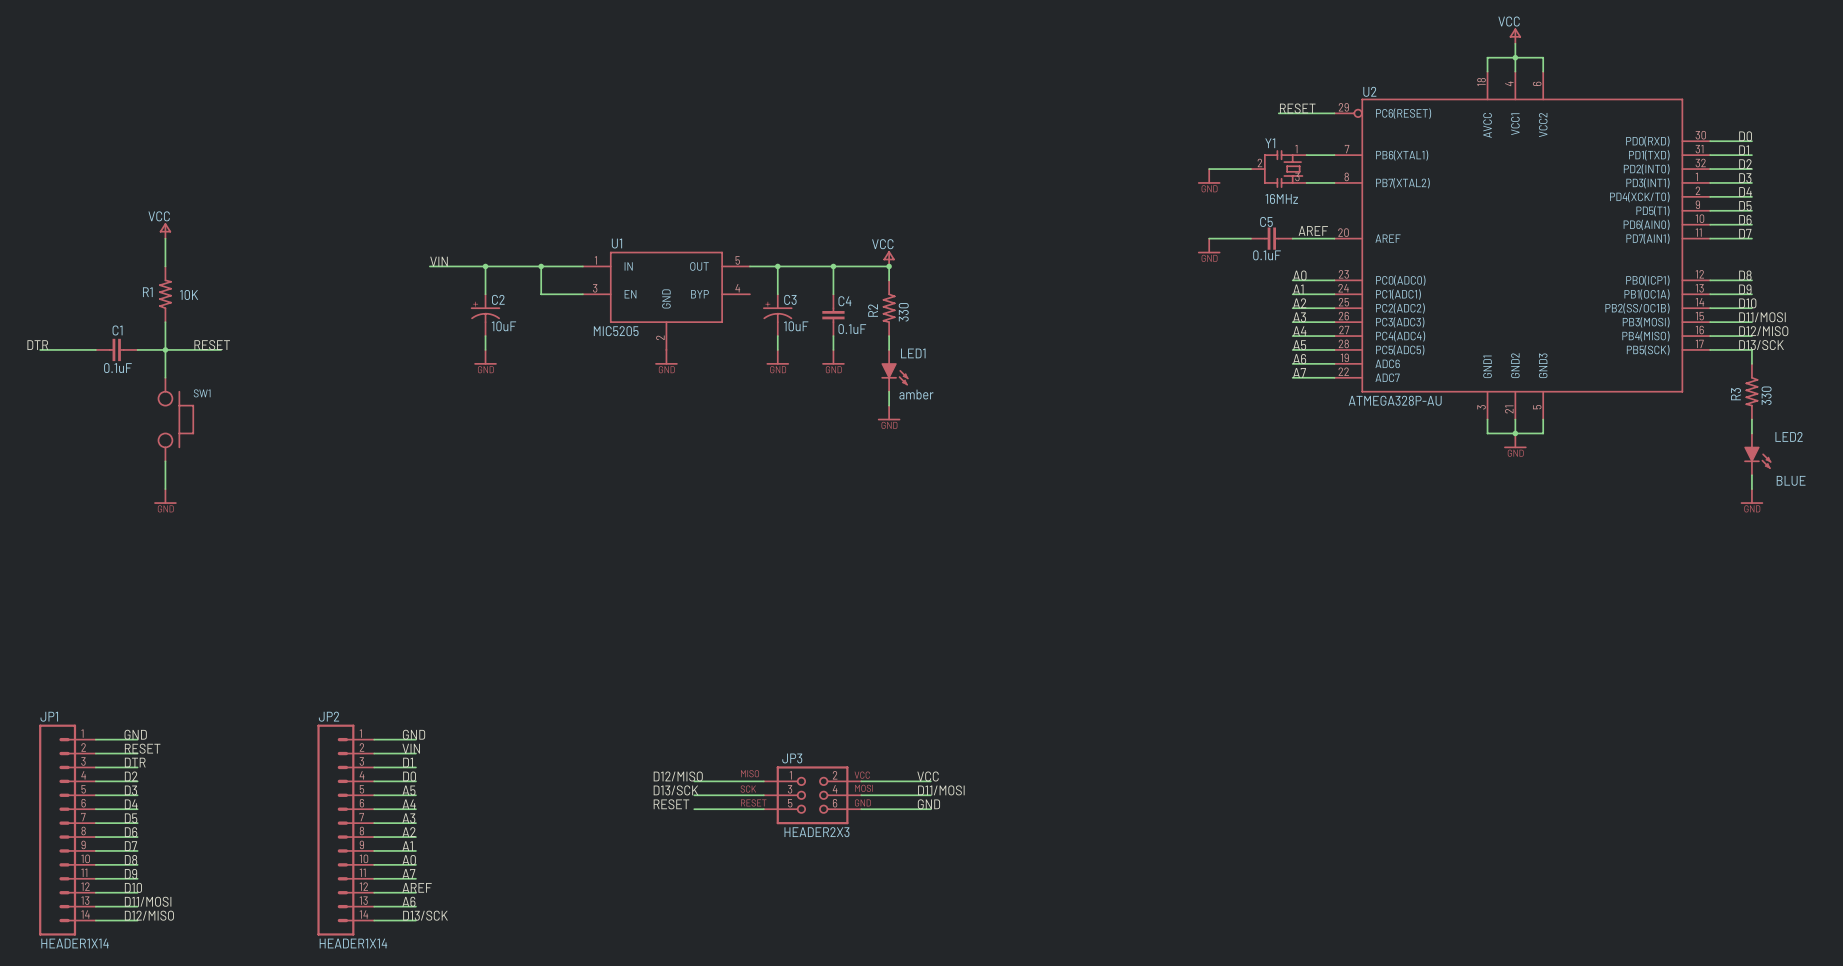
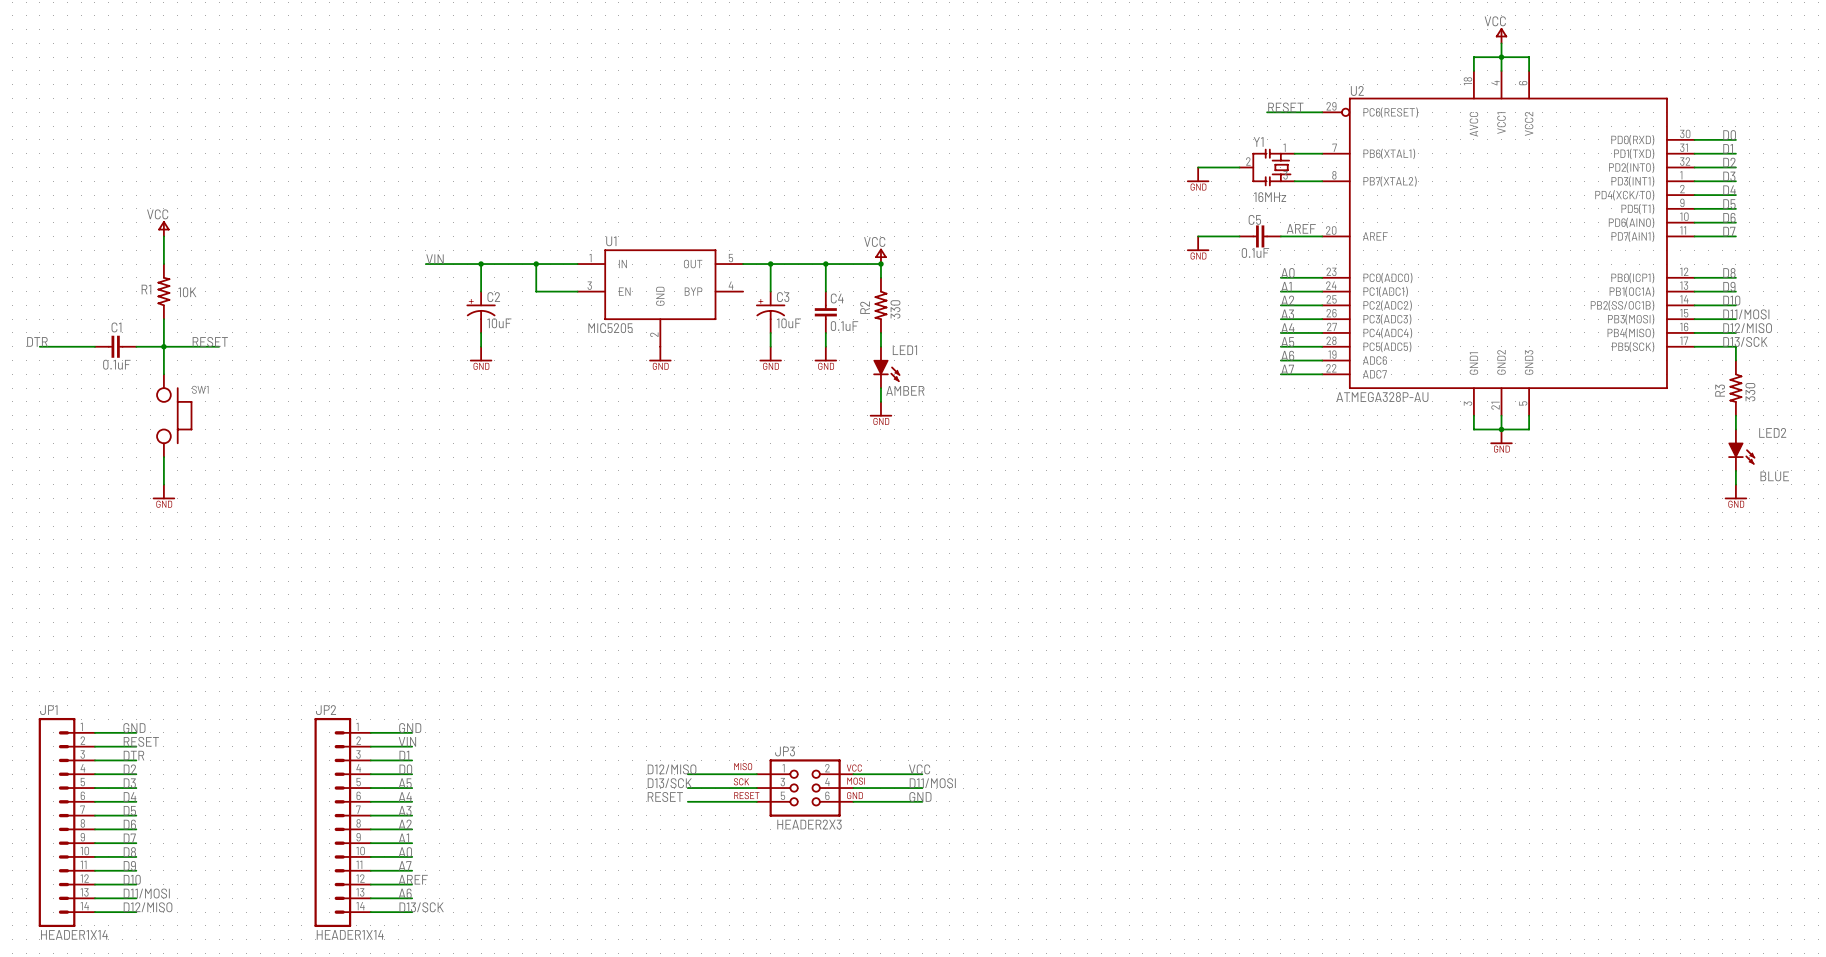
LED1 value: amber (916, 394) -> AMBER (905, 390)

